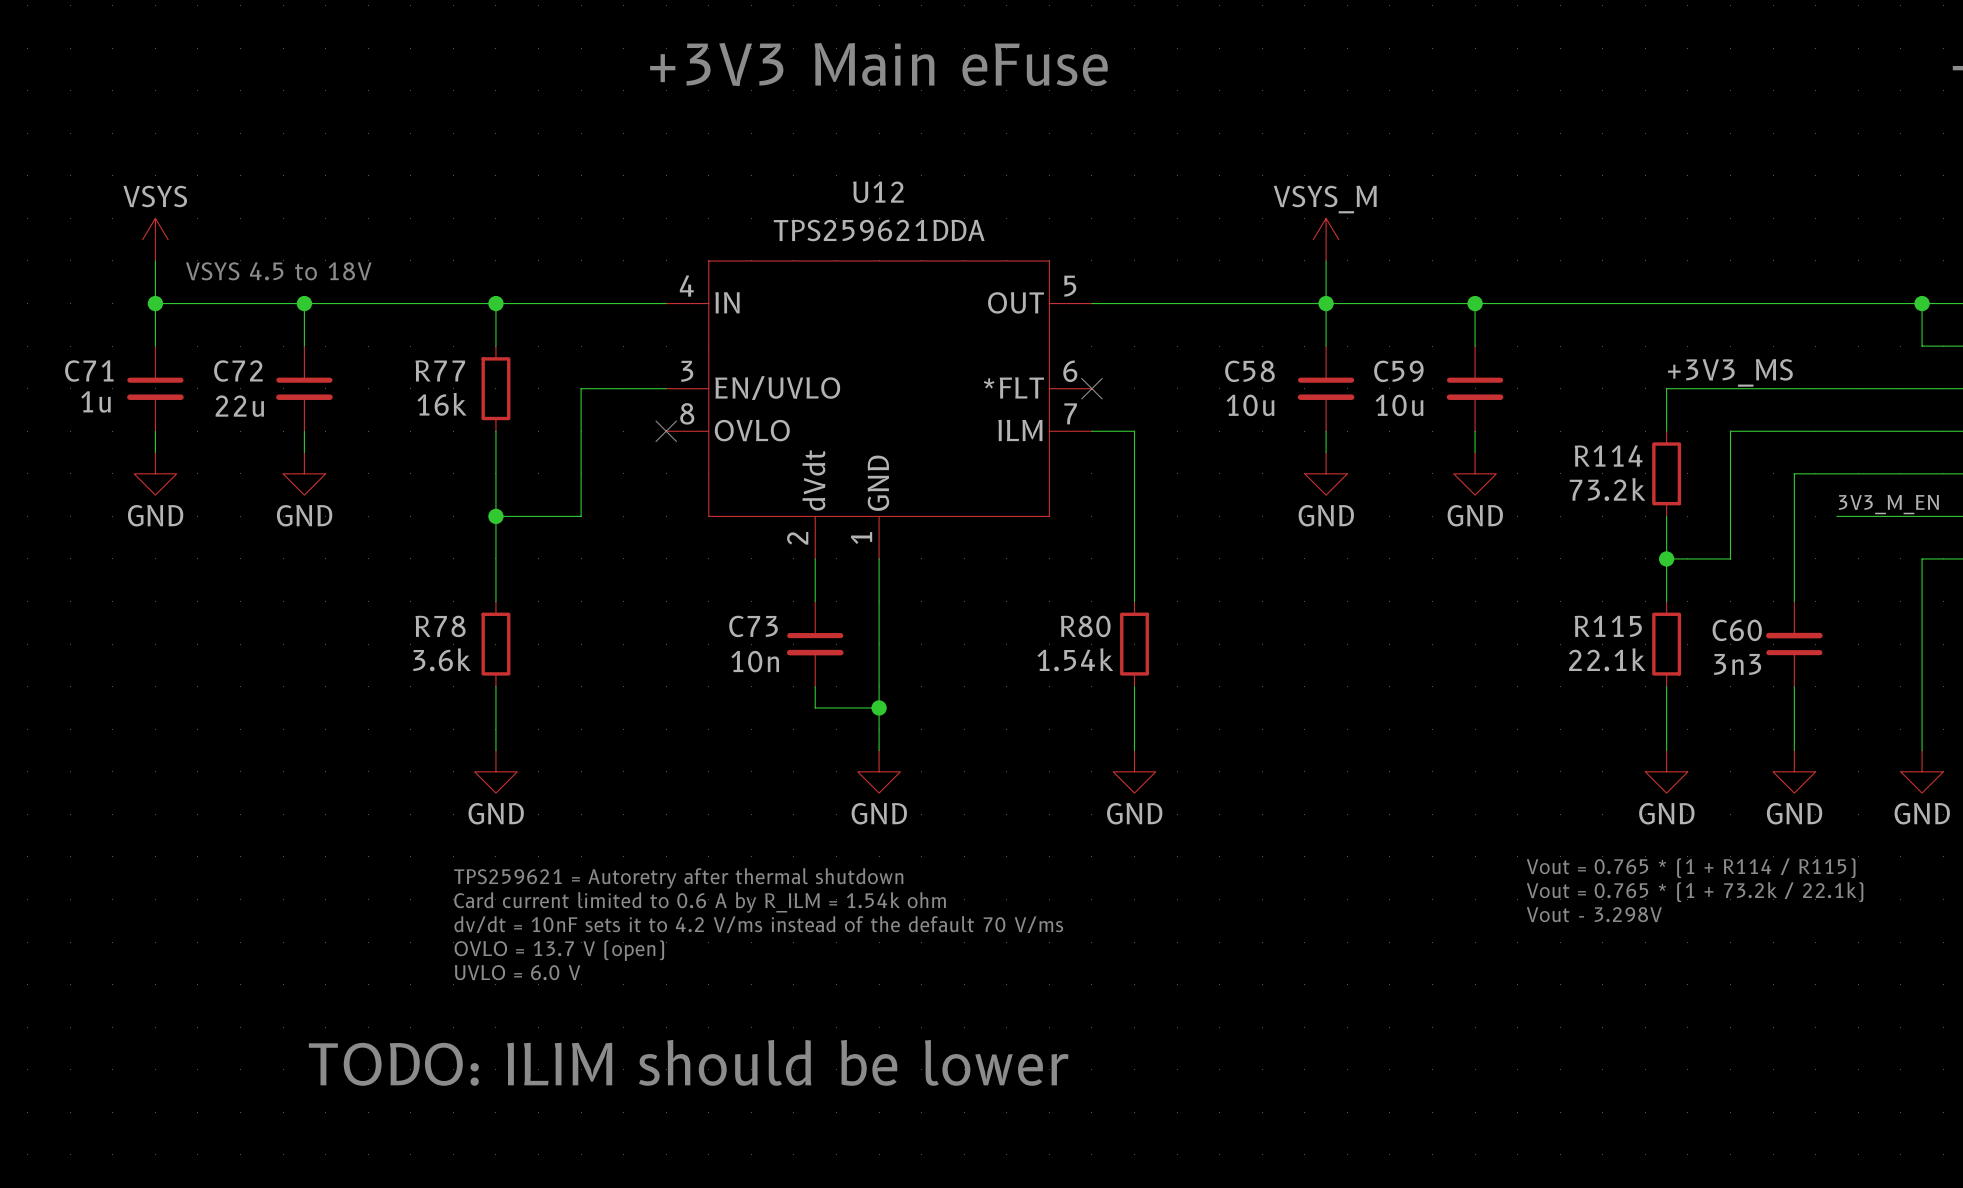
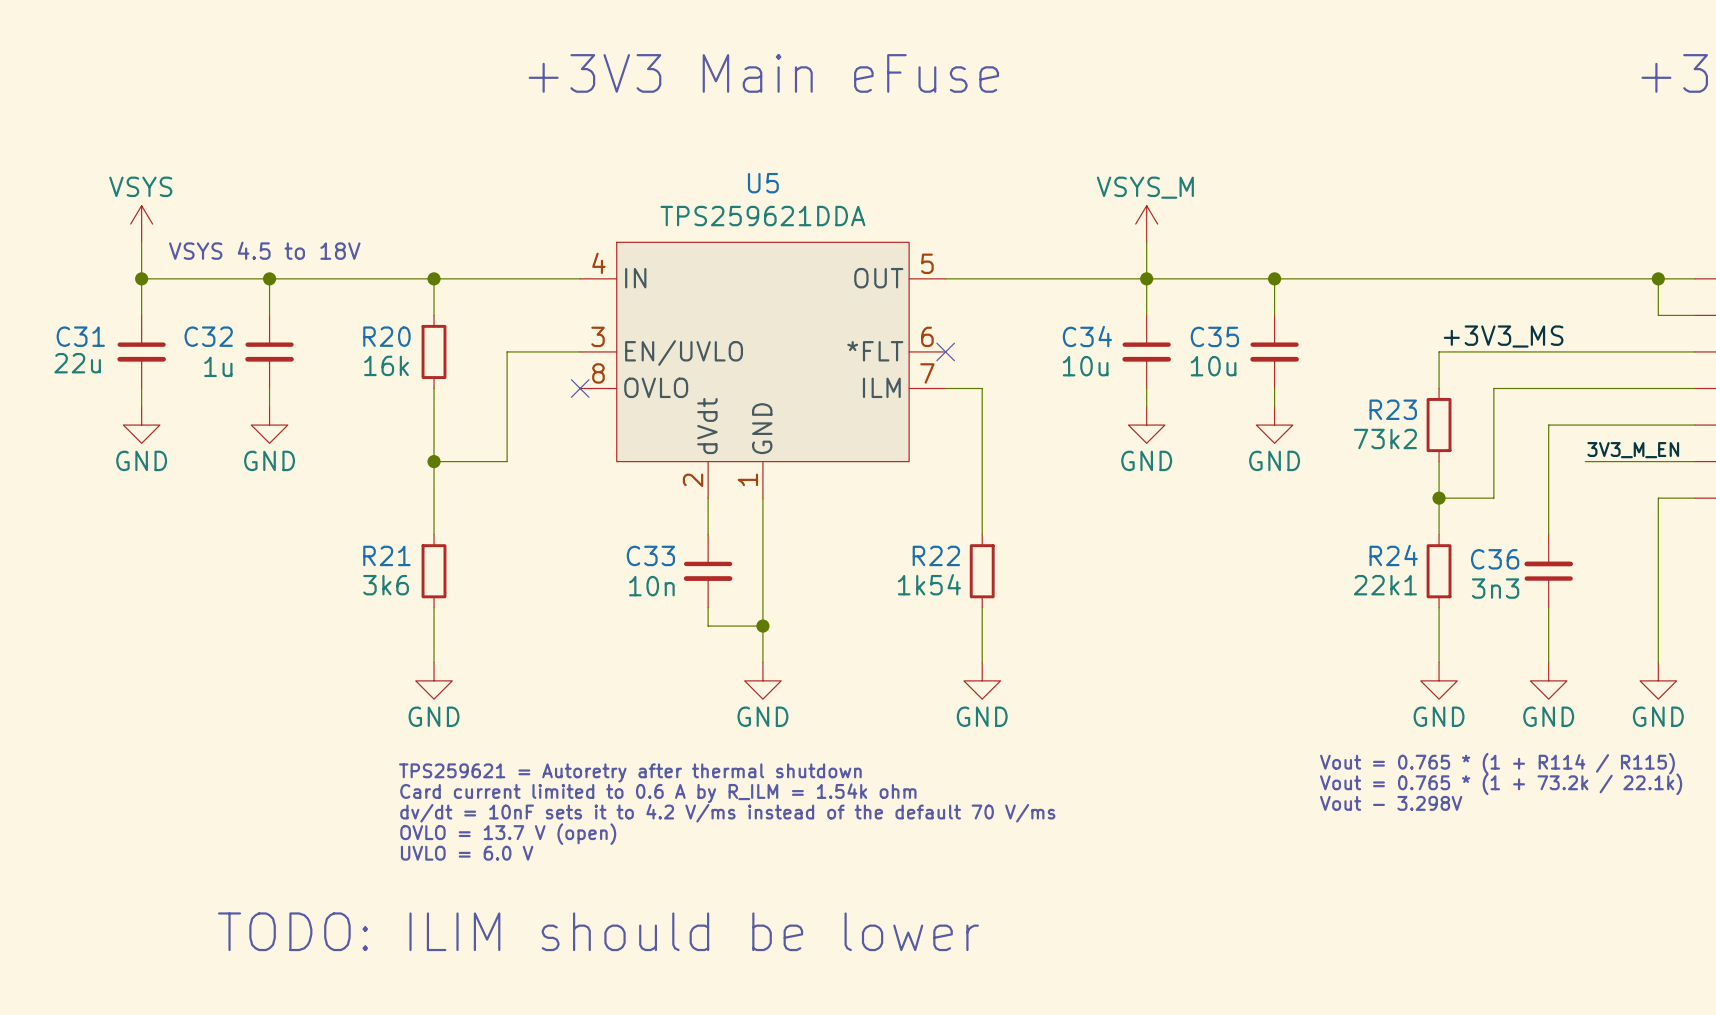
U12 name: U12 (878, 192) -> U5 (763, 183)
C71 name: C71 (89, 370) -> C31 (80, 336)
R77 name: R77 (440, 370) -> R20 (386, 336)
C72 name: C72 (238, 371) -> C32 (208, 336)
C58 name: C58 (1249, 371) -> C34 (1087, 336)
C59 name: C59 (1398, 371) -> C35 (1214, 336)
C71 value: 1u (95, 401) -> 22u (77, 363)
C72 value: 22u (239, 406) -> 1u (218, 366)
R114 name: R114 (1608, 456) -> R23 (1393, 409)
R114 value: 73.2k (1607, 489) -> 73k2 (1385, 438)
R78 name: R78 (440, 626) -> R21 (386, 555)
C73 name: C73 (753, 626) -> C33 (650, 555)
R80 name: R80 (1085, 626) -> R22 (936, 555)
R115 name: R115 (1608, 626) -> R24 (1393, 555)
C60 name: C60 (1737, 630) -> C36 (1495, 559)
R78 value: 3.6k (442, 659) -> 3k6 (386, 585)
R80 value: 1.54k (1075, 659) -> 1k54 (929, 584)
R115 value: 22.1k (1607, 659) -> 22k1 (1385, 585)

